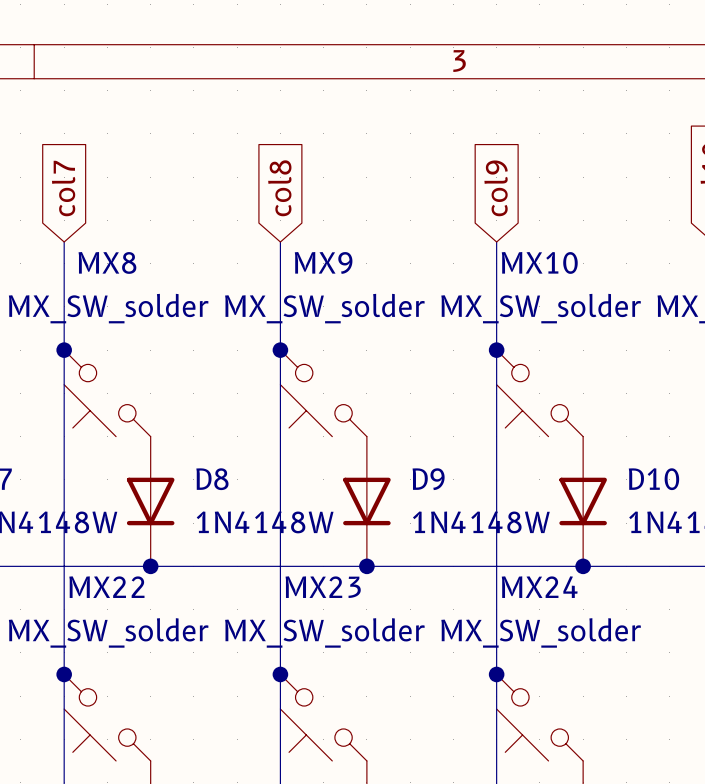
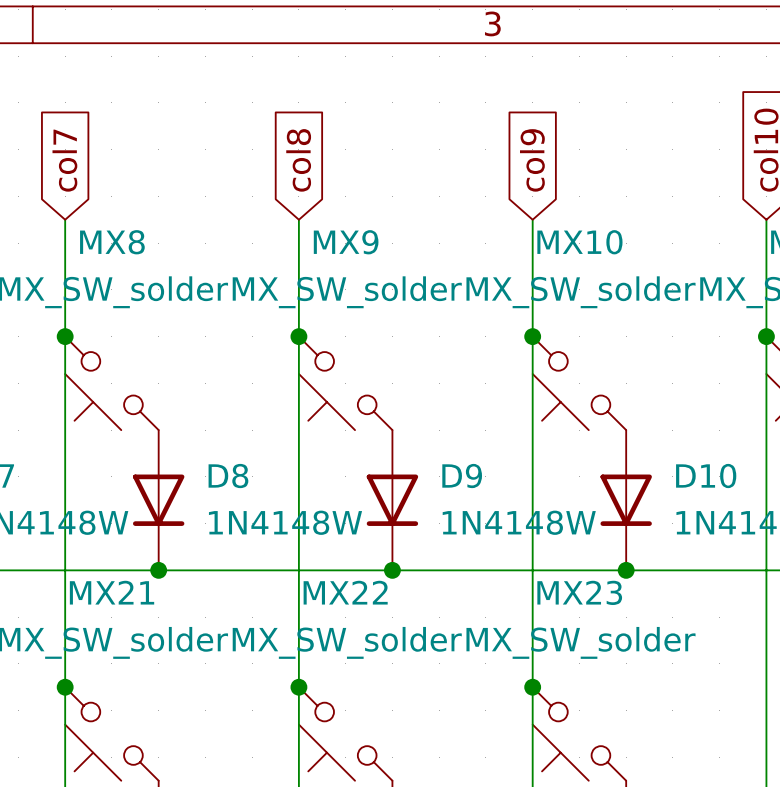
MX22 name: MX22 (106, 587) -> MX21 (112, 592)
MX23 name: MX23 (323, 587) -> MX22 (345, 592)
MX24 name: MX24 (539, 587) -> MX23 (579, 592)

